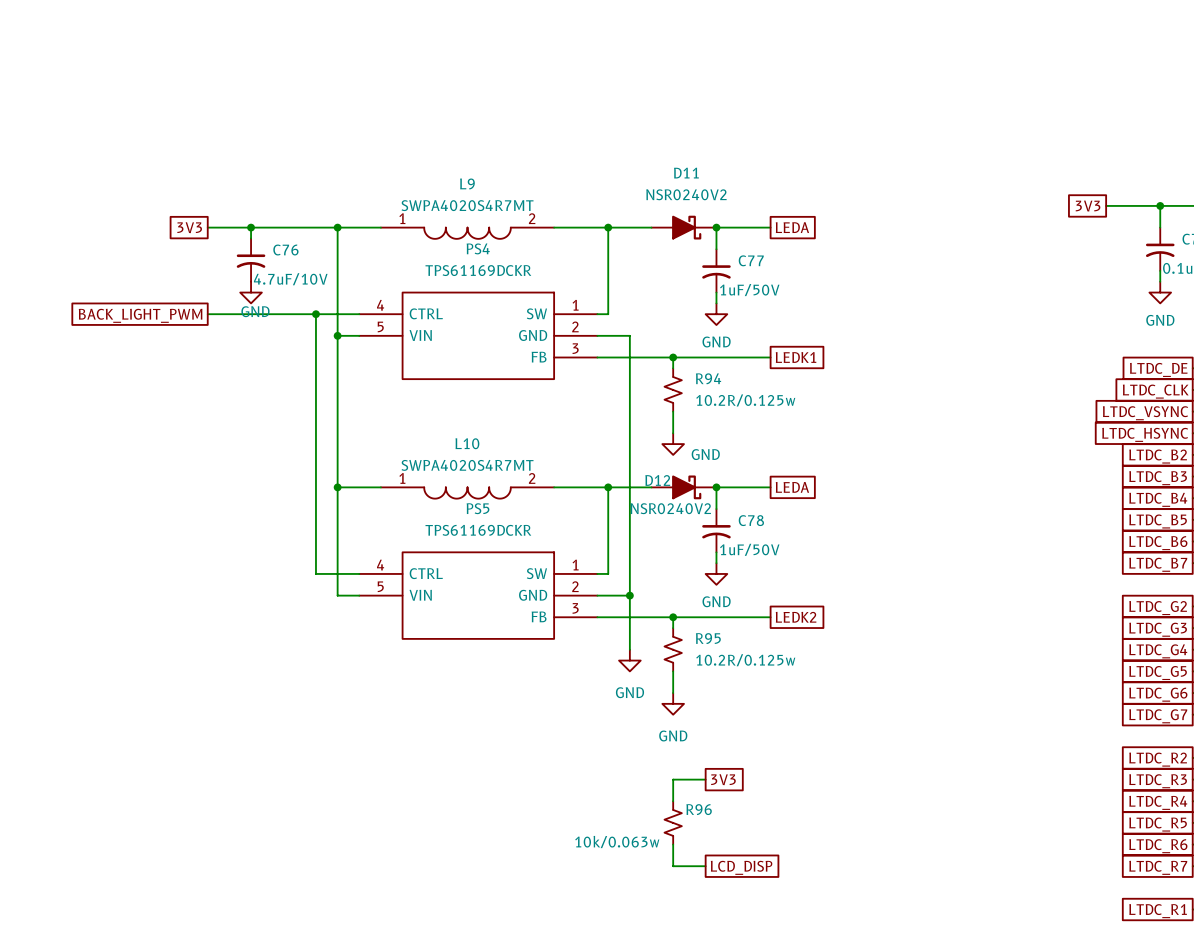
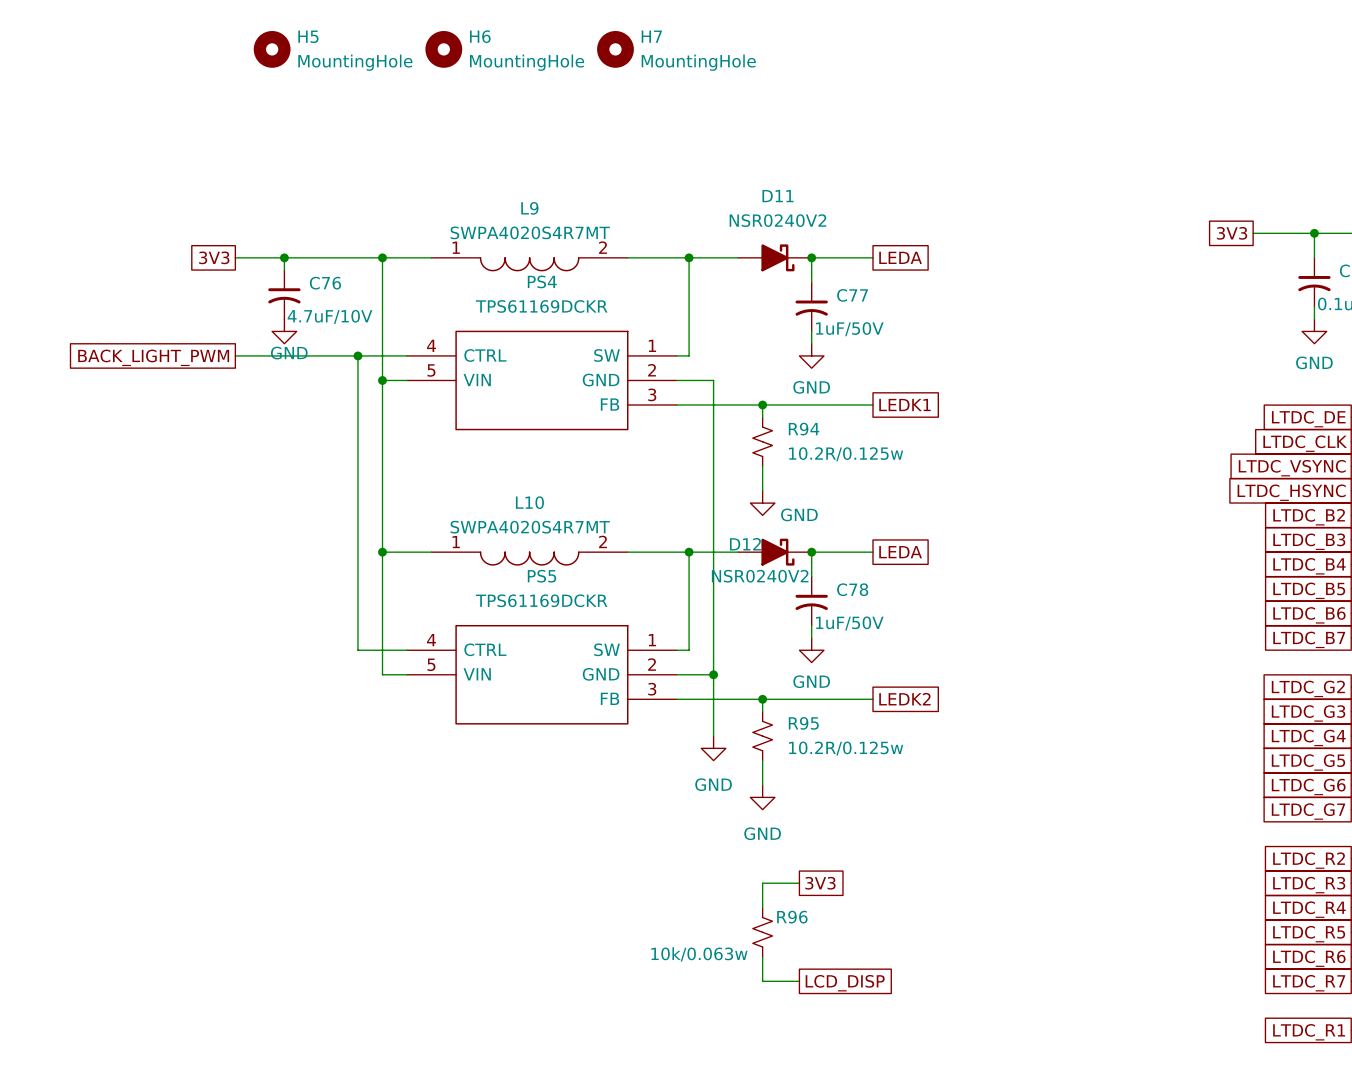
H5: none -> MountingHole (272, 49)
H6: none -> MountingHole (443, 49)
H7: none -> MountingHole (615, 49)

